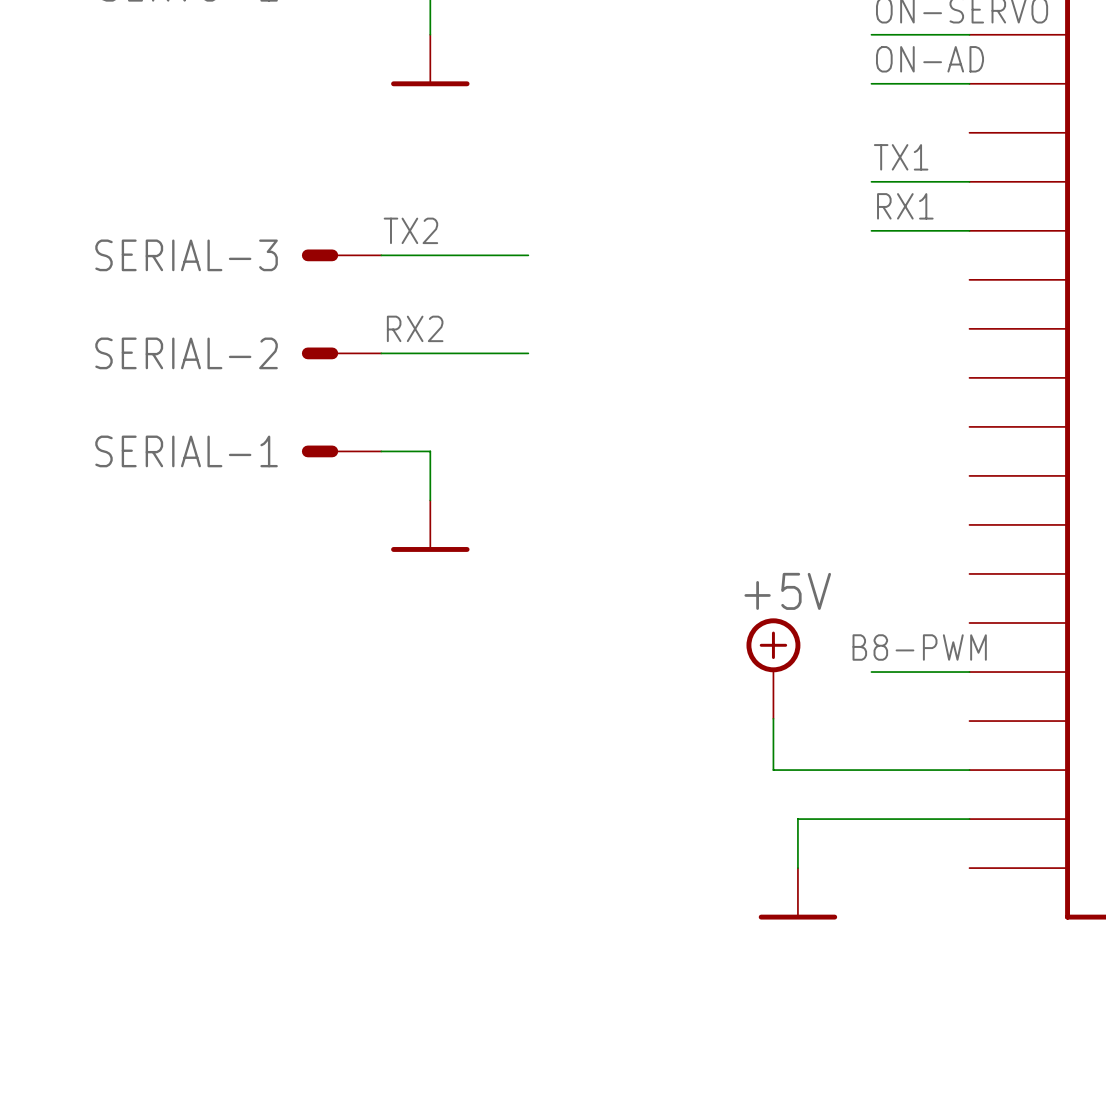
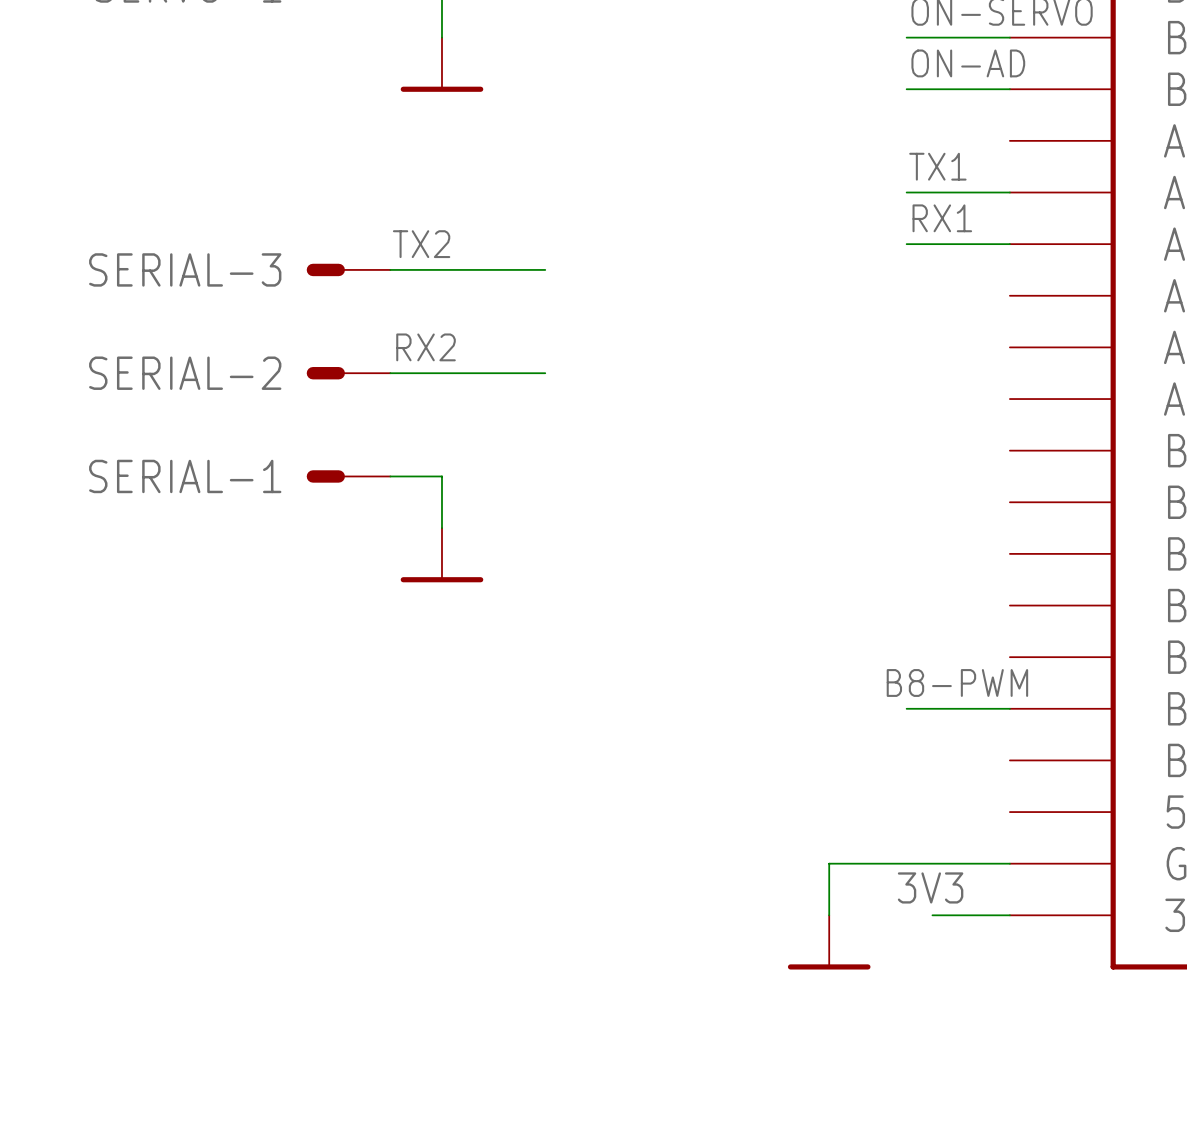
power symbol: +5V (773, 668) -> none
wire: (773, 718) (773, 770) (969, 770) -> none
label: none -> 3V3 (930, 887)
wire: none -> (932, 915) (1009, 915)

